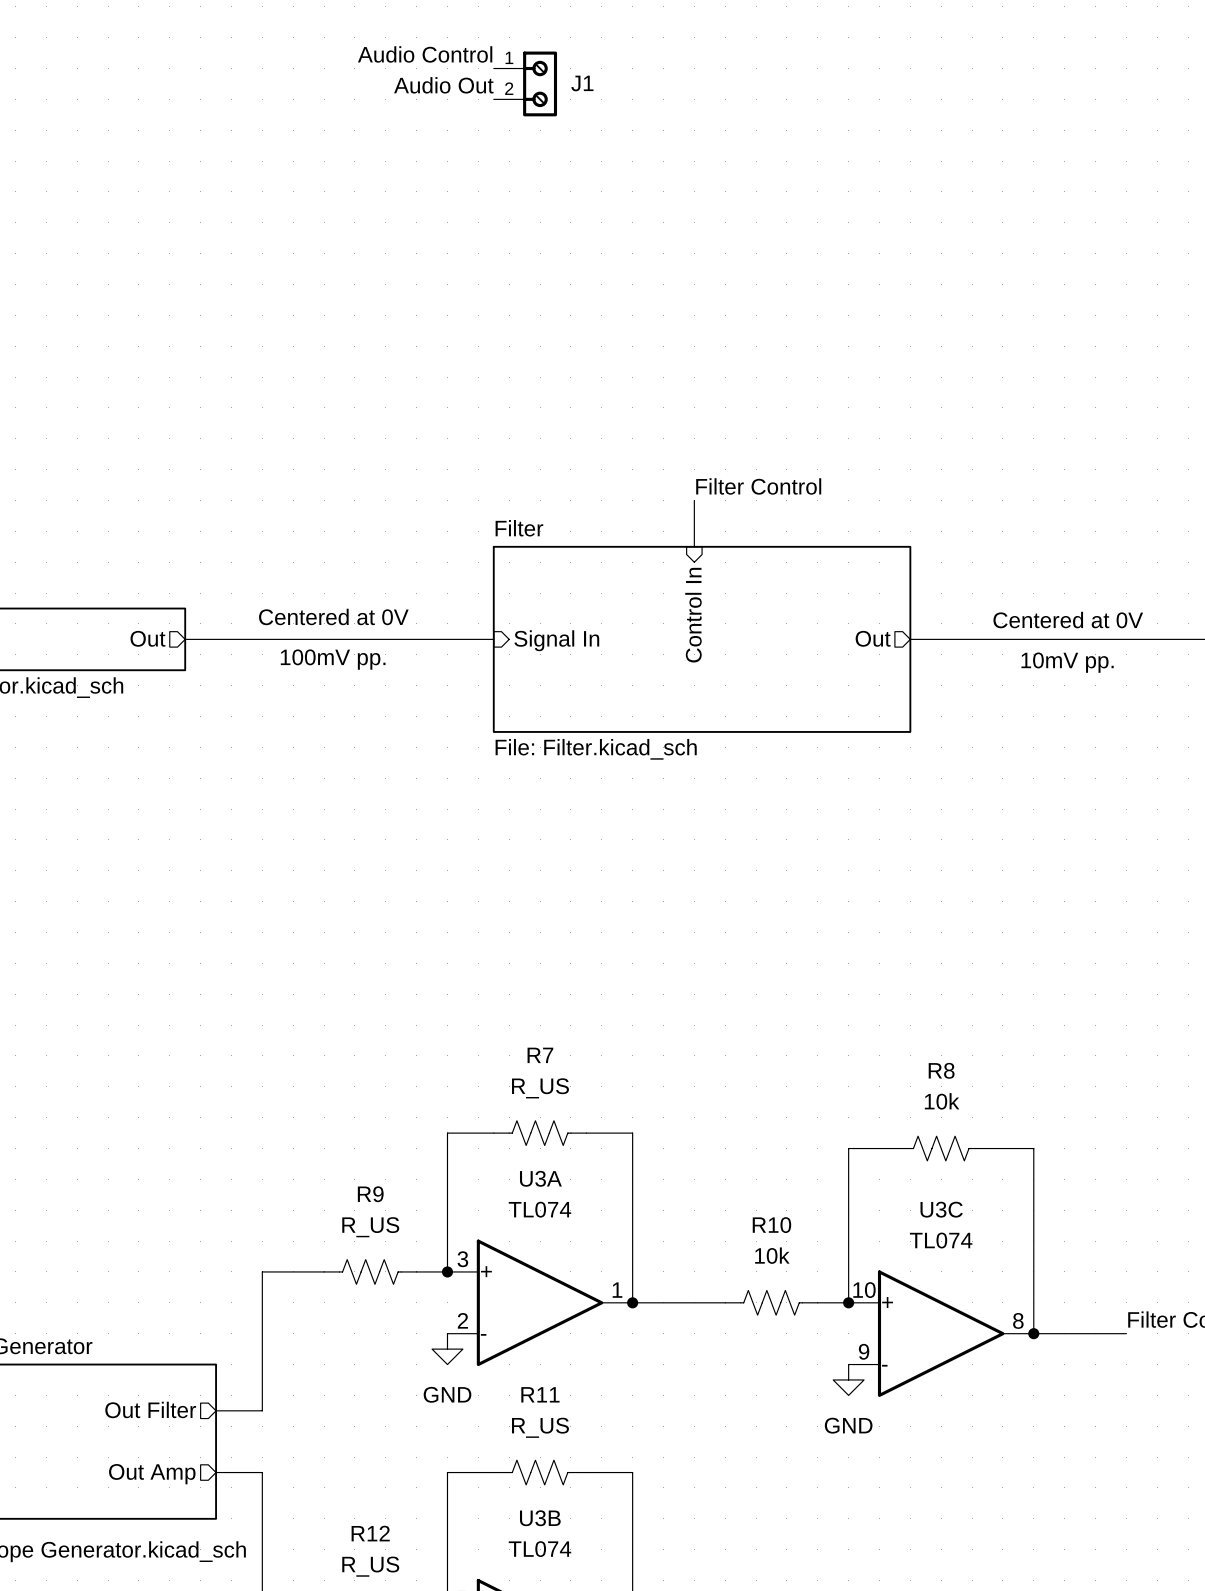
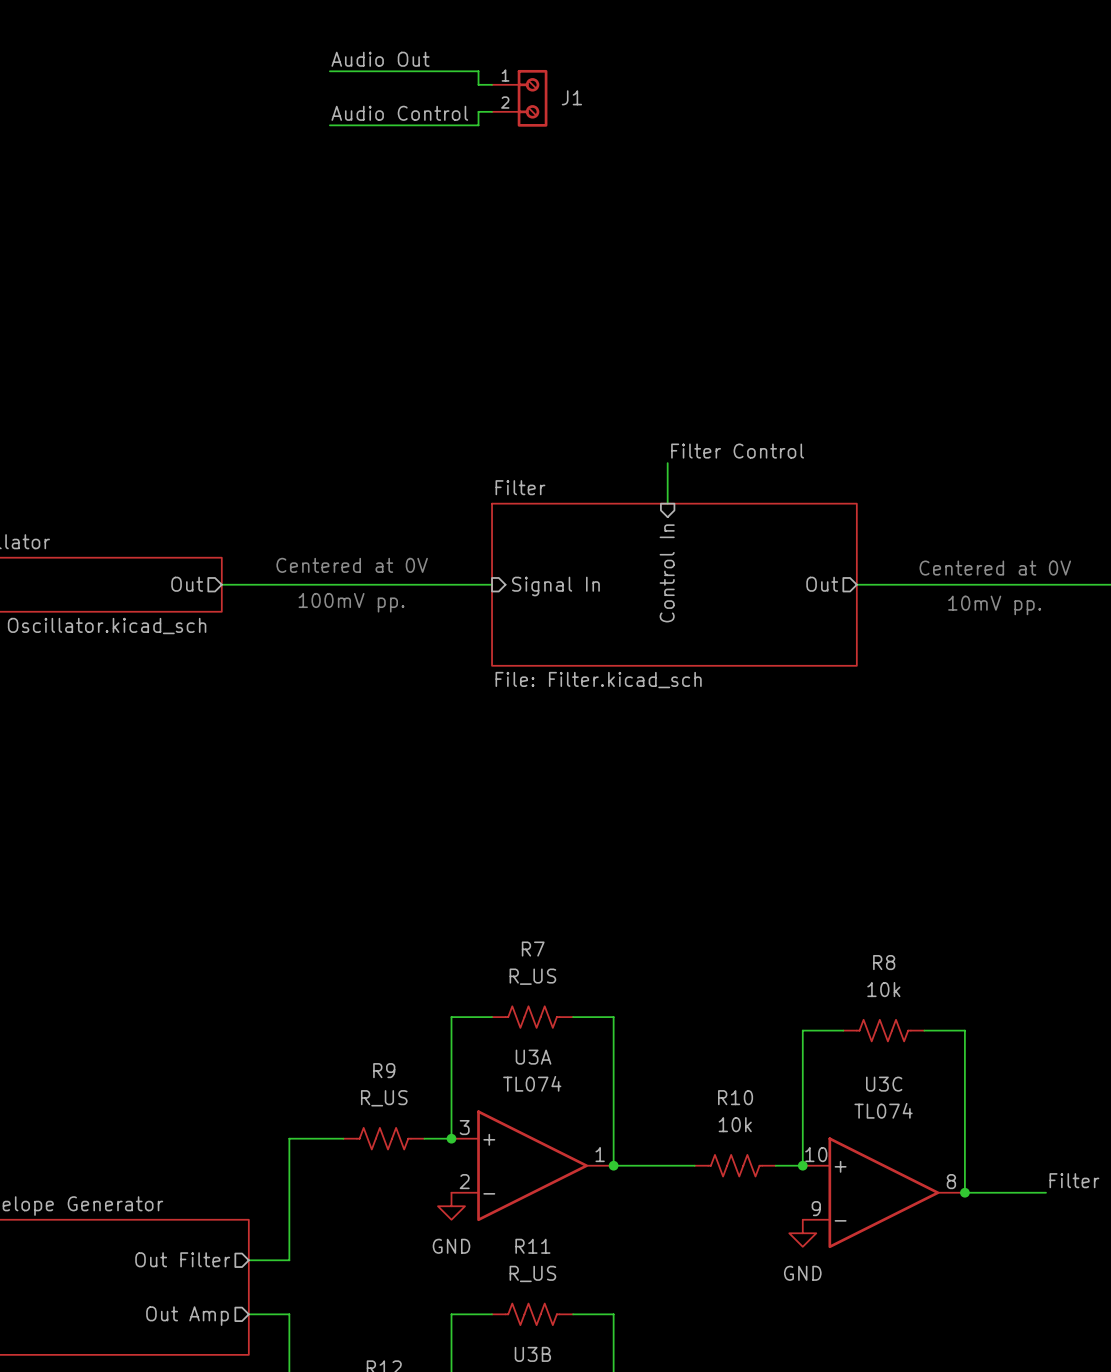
wire: none -> (329, 71) (478, 71) (478, 84) (492, 84)
label position: Audio Control (425, 54) -> Audio Control (399, 113)
label position: Audio Out (443, 85) -> Audio Out (380, 59)
wire: none -> (492, 111) (478, 111) (478, 125) (329, 125)

